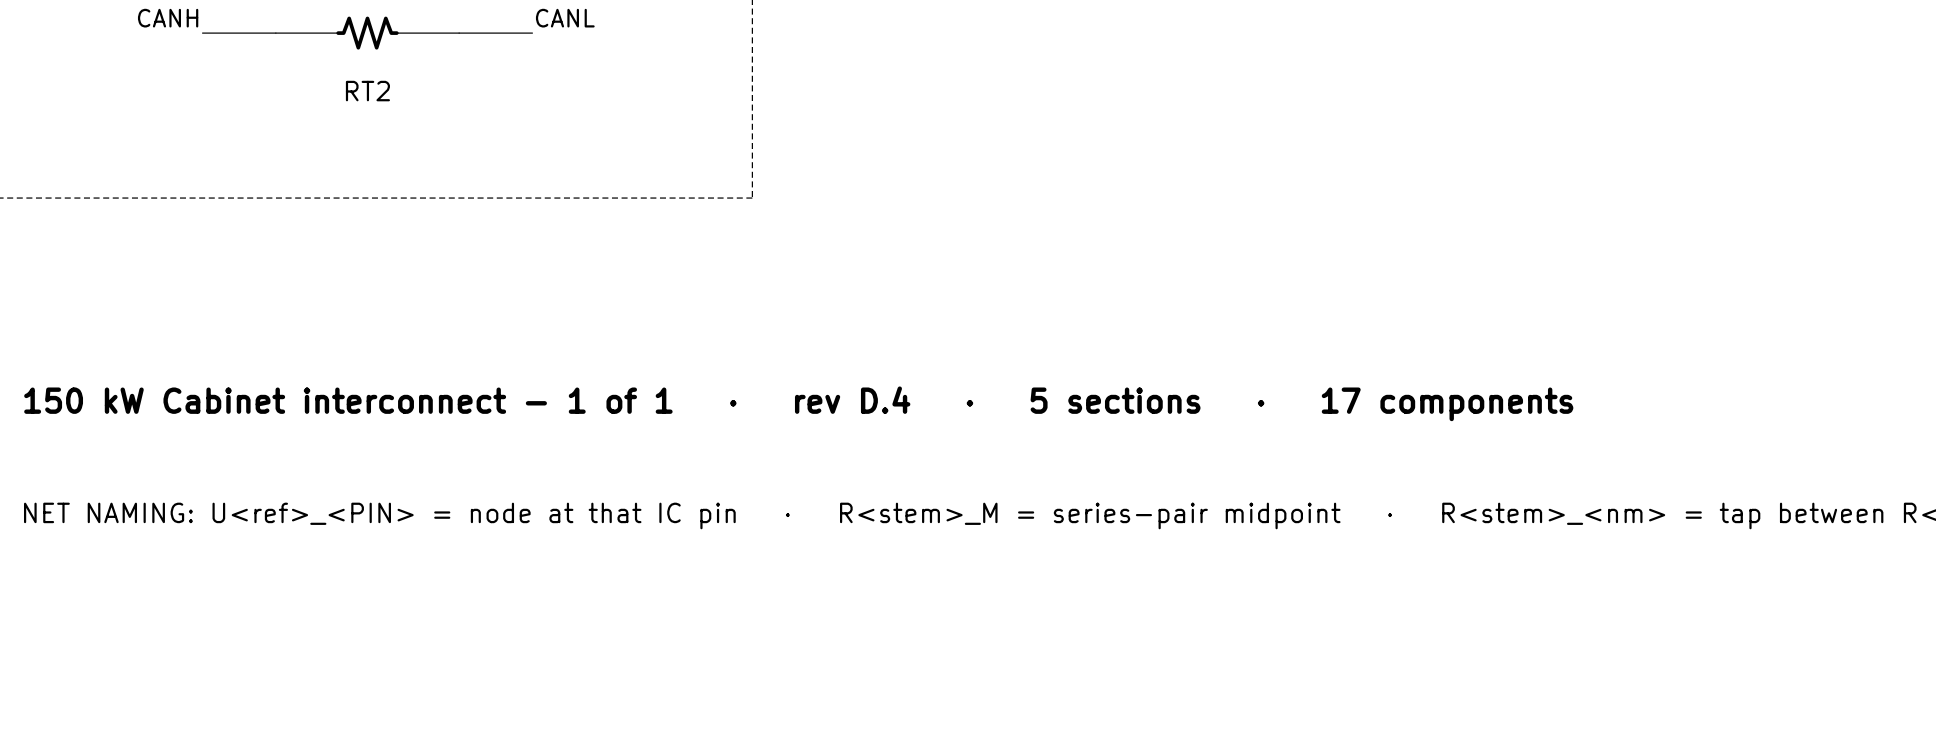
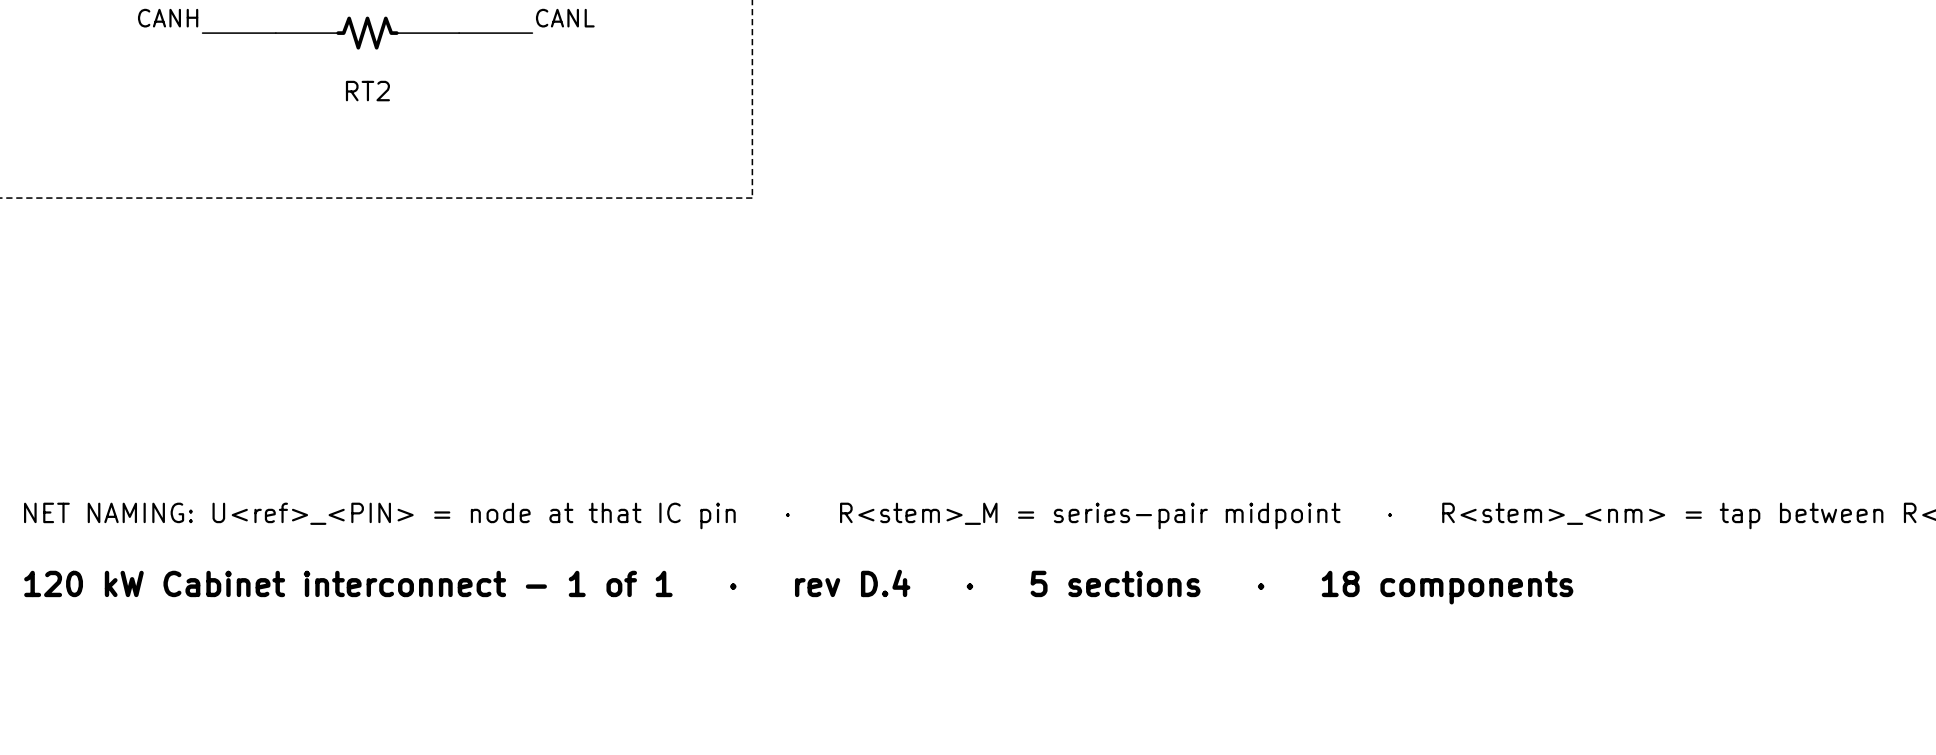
text: 150 kW Cabinet interconnect - 1 of 1 · rev D.4 · 5 sections · 17 components (798, 403) -> none
text: none -> 120 kW Cabinet interconnect - 1 of 1 · rev D.4 · 5 sections · 18 components (798, 587)

